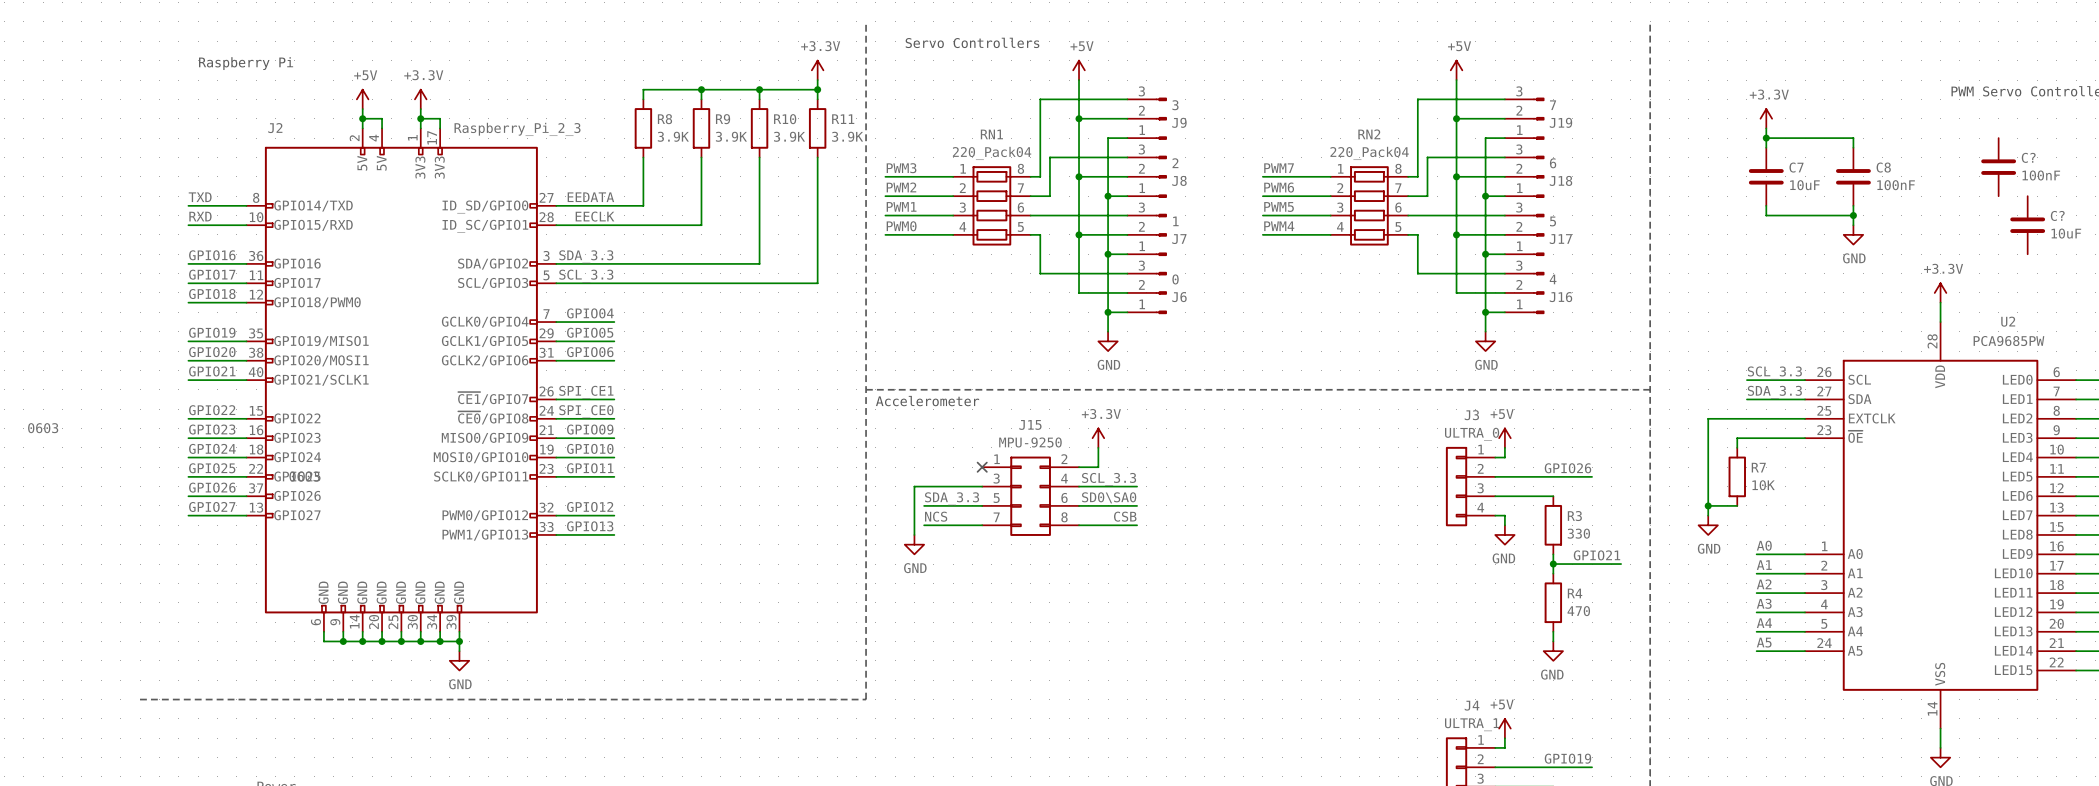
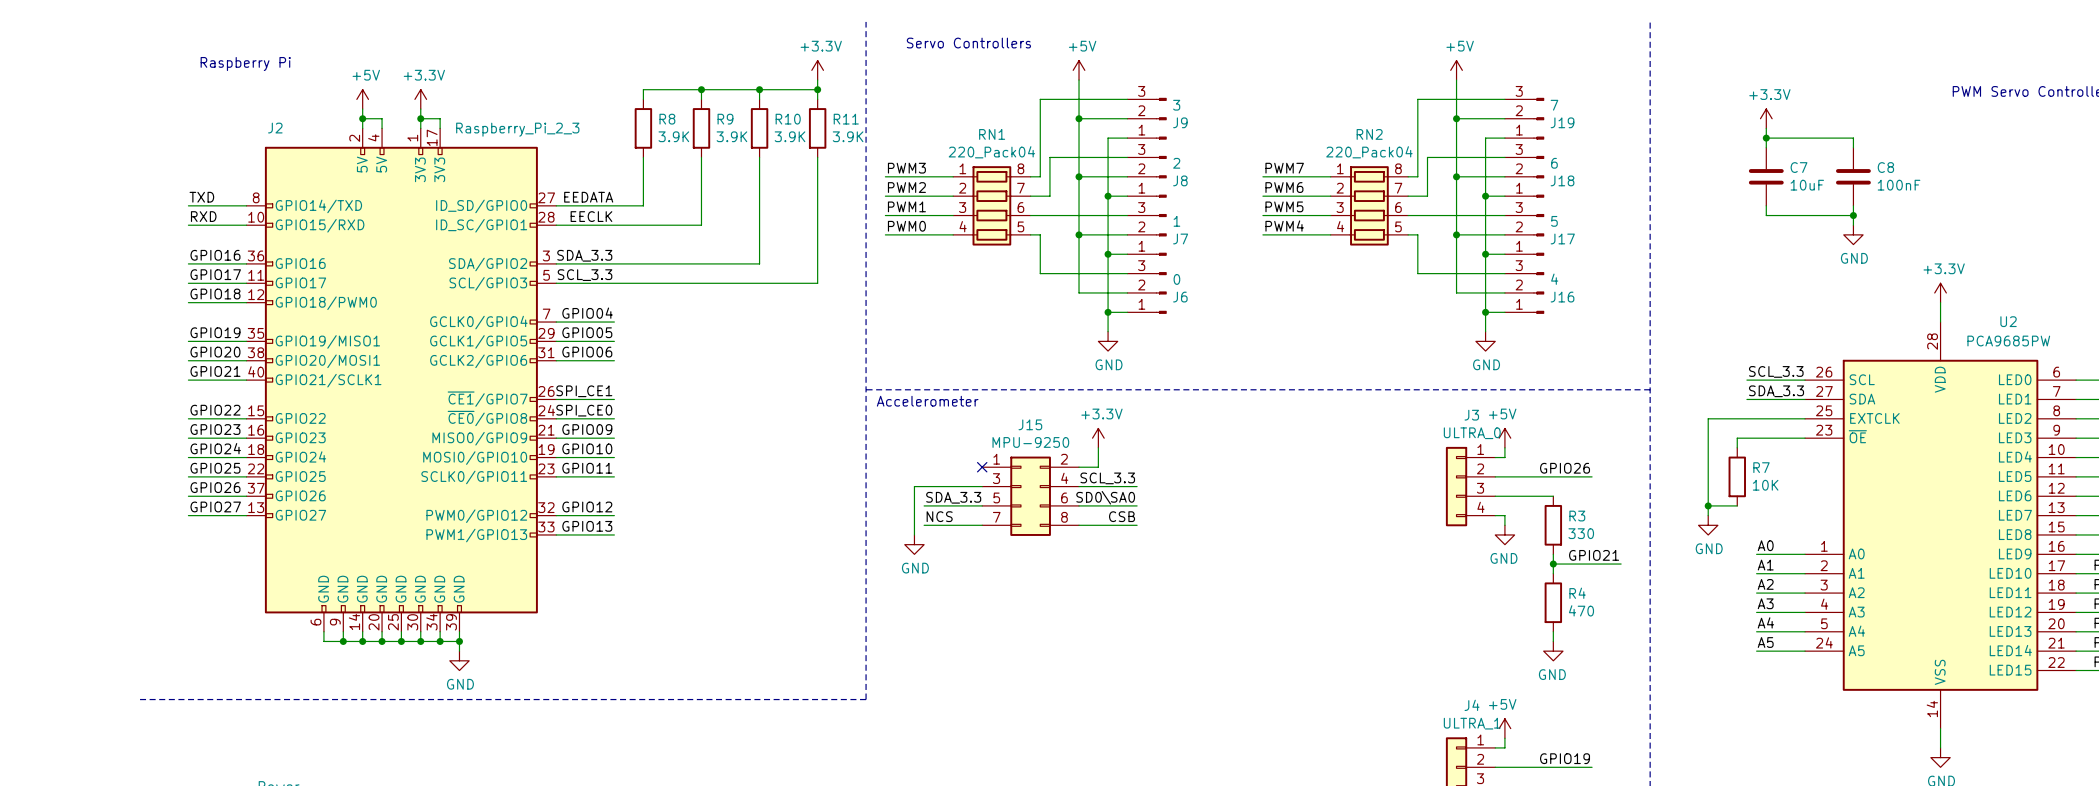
C?: 100nF (1998, 167) -> none
C?: 10uF (2027, 225) -> none
C7 text: 0603 (43, 428) -> none

